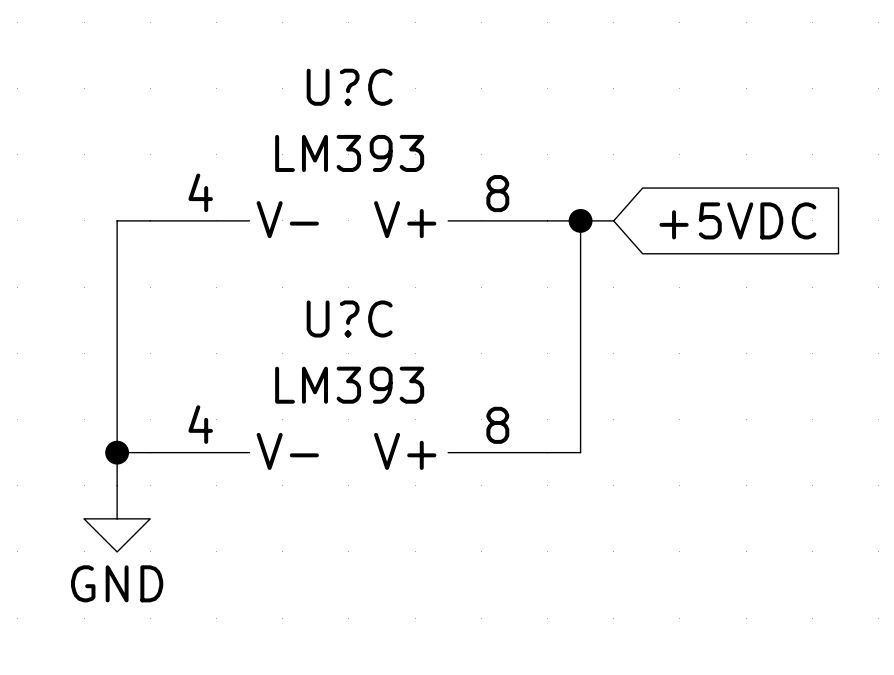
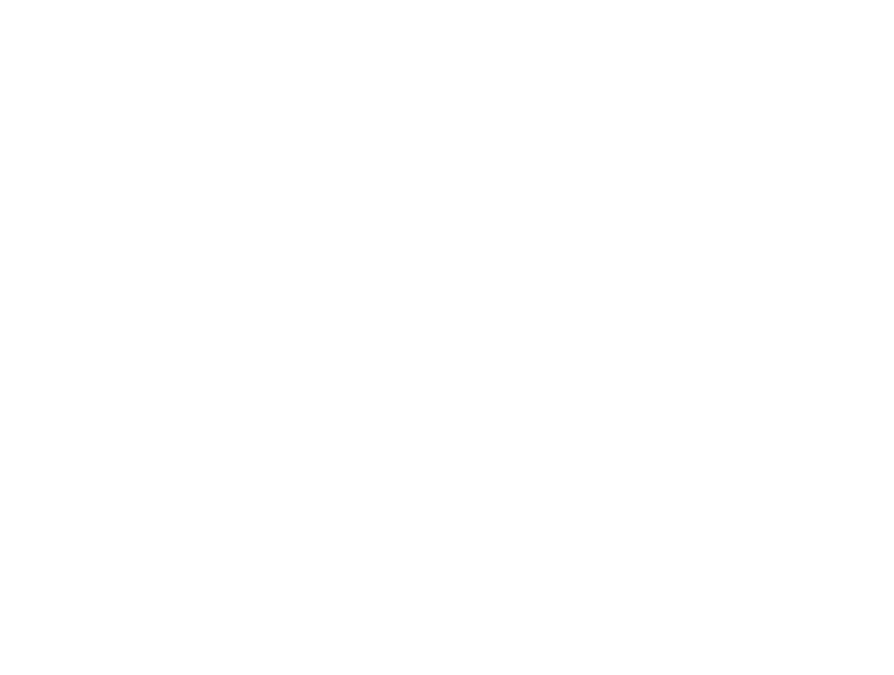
wire: (150, 220) (117, 220) (117, 485) -> none
U?C: LM393 (348, 220) -> none
wire: (547, 220) (613, 220) -> none
wire: (580, 220) (580, 452) (547, 452) -> none
junction: (580, 220) -> none
global label: +5VDC (737, 220) -> none
wire: (117, 452) (150, 452) -> none
junction: (117, 452) -> none
U?C: LM393 (348, 452) -> none
power symbol: GND (117, 518) -> none

